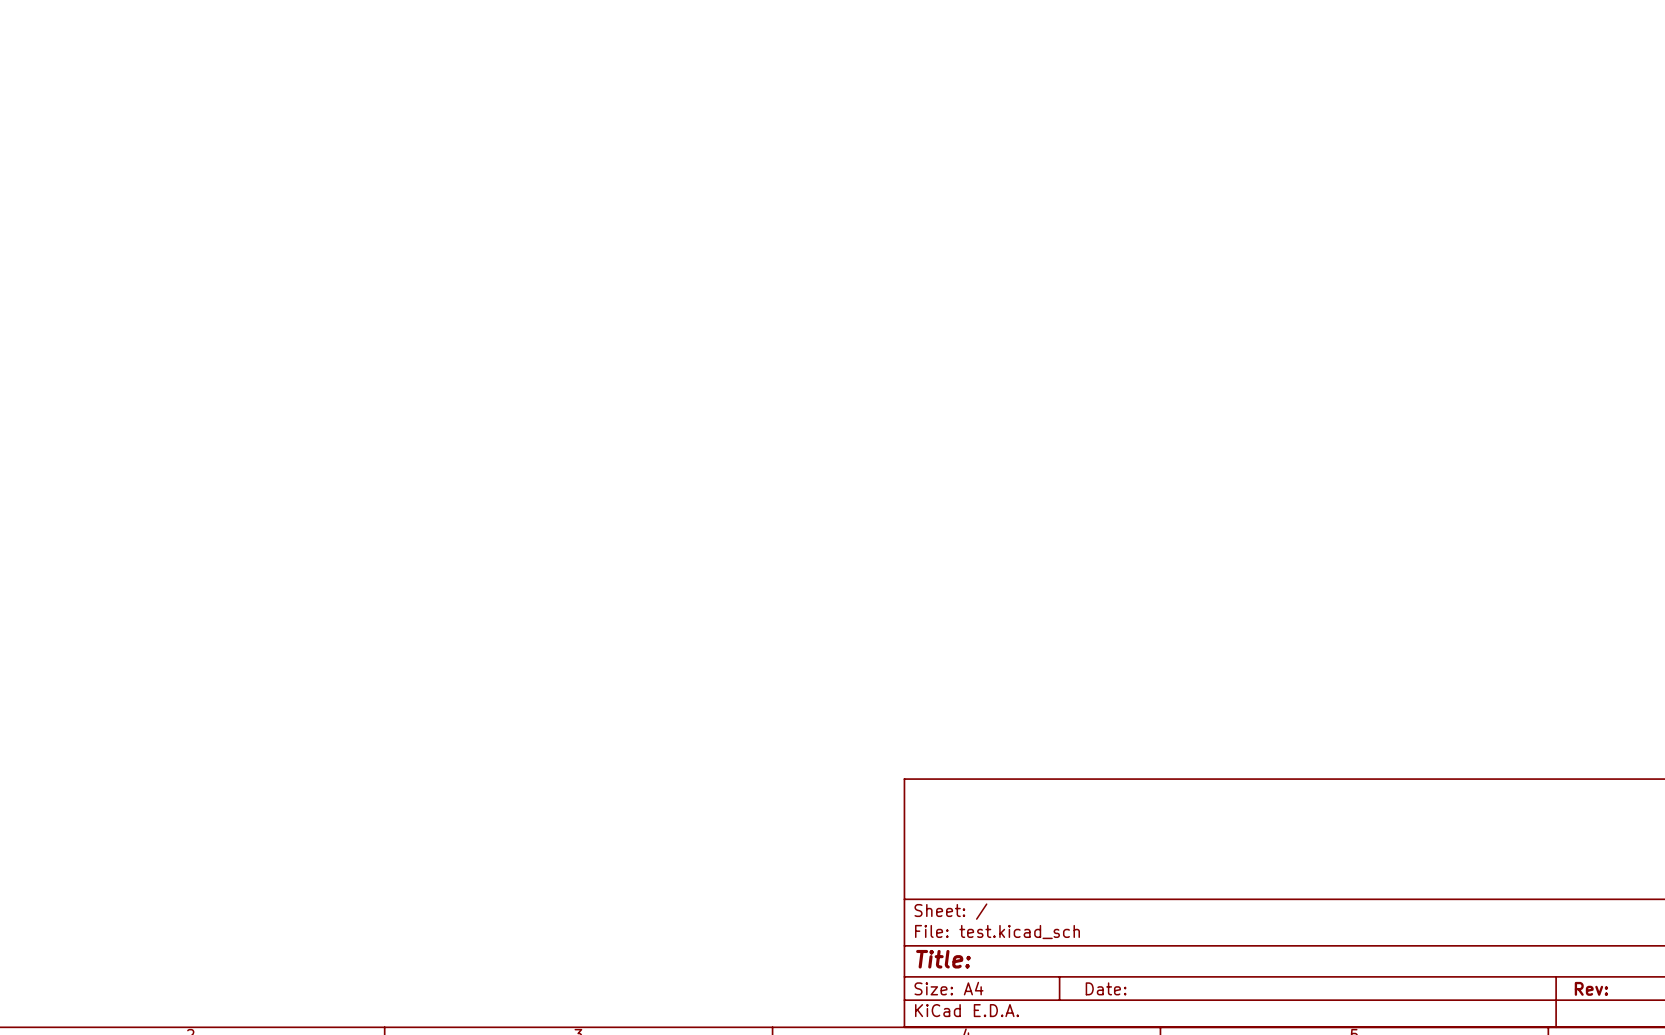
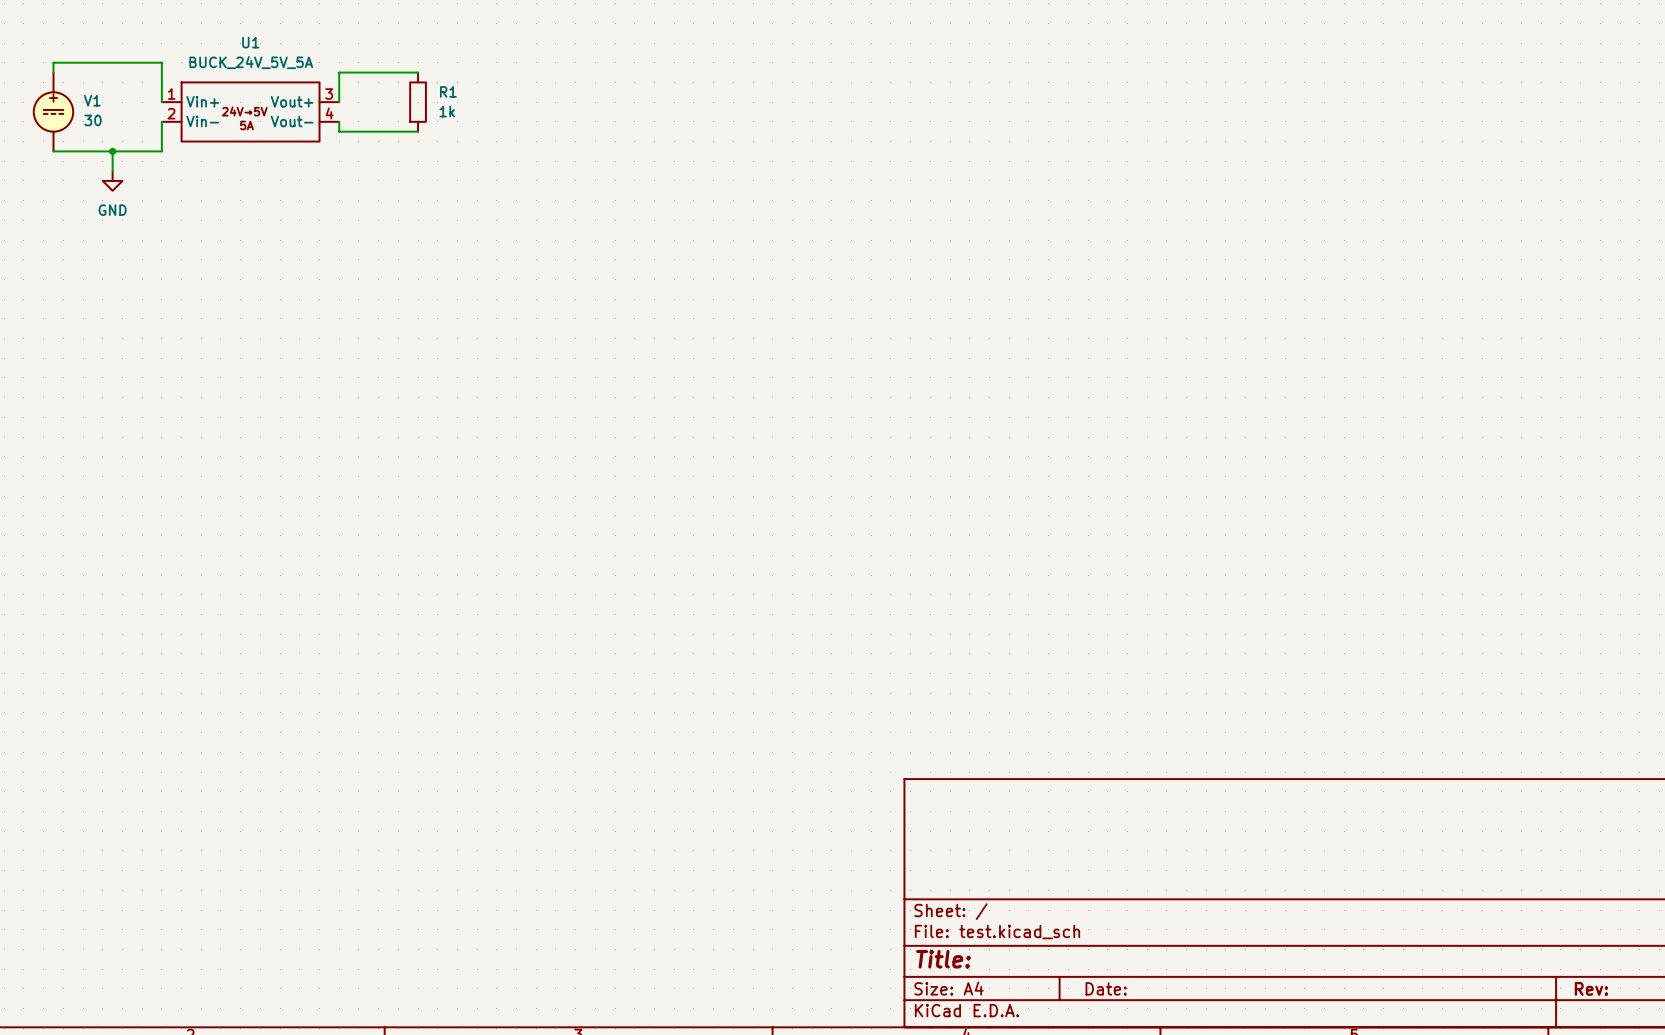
wire: none -> (53, 72) (53, 62) (161, 62) (161, 102)
wire: none -> (418, 72) (339, 72) (339, 102)
R1: none -> 1k (418, 102)
V1: none -> 30 (53, 111)
U1: none -> BUCK_24V_5V_5A (250, 111)
wire: none -> (161, 121) (161, 151) (53, 151)
wire: none -> (339, 121) (339, 131) (418, 131)
wire: none -> (112, 151) (112, 171)
junction: none -> (112, 151)
power symbol: none -> GND (112, 180)

